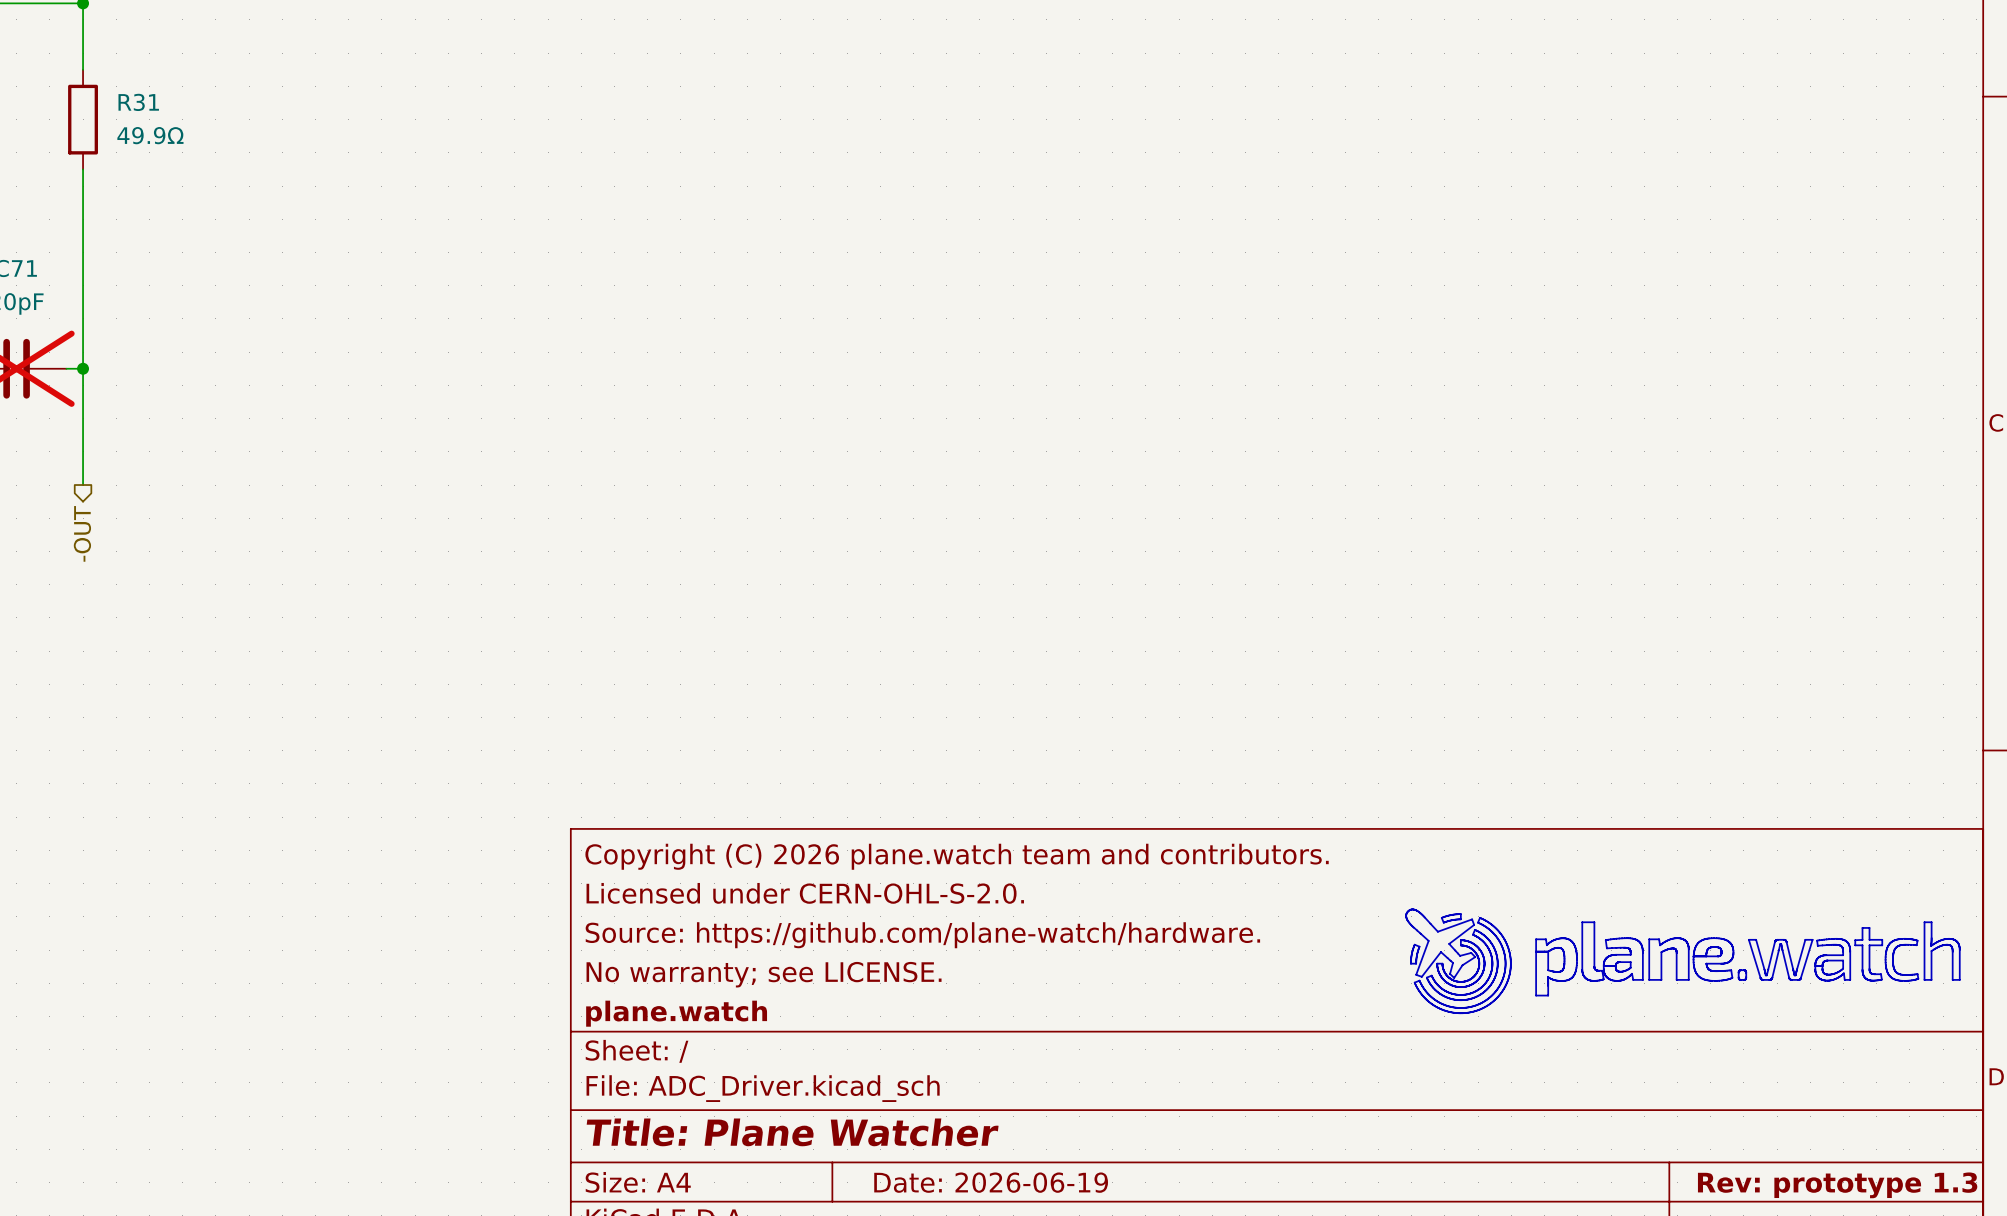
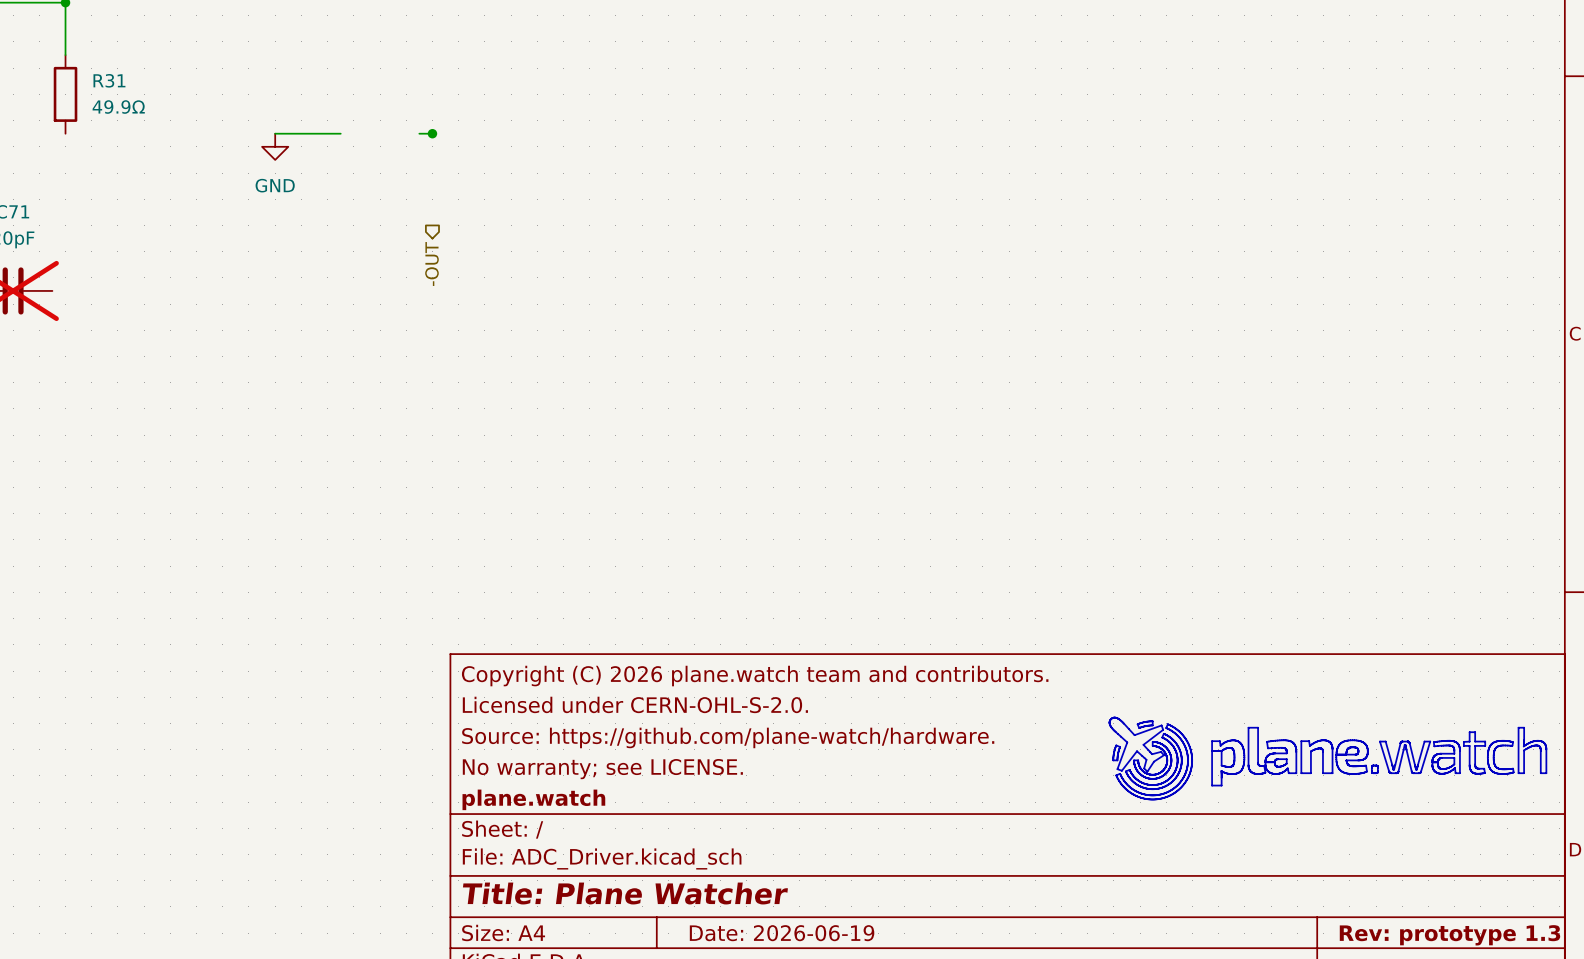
wire: (83, 169) (83, 485) -> none
wire: none -> (275, 133) (340, 133)
wire: none -> (419, 133) (432, 133)
junction: none -> (432, 133)
power symbol: none -> GND (275, 146)
hierarchical label: none -> -OUT (431, 264)
wire: (66, 368) (83, 368) -> none
junction: (83, 368) -> none
hierarchical label: -OUT (82, 533) -> none

